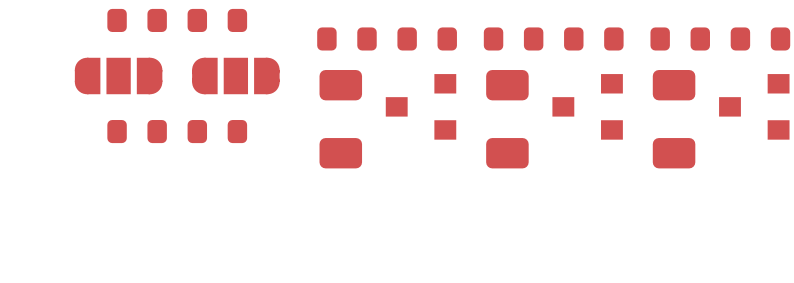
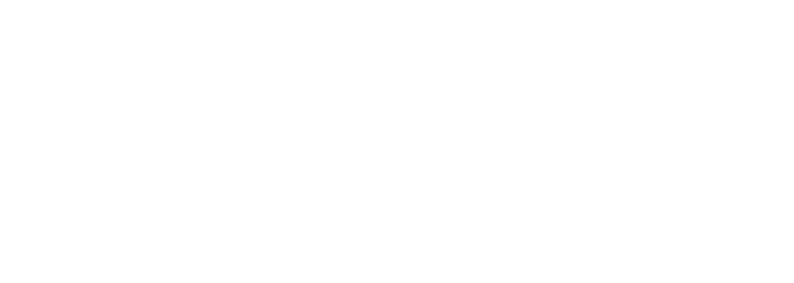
part: (137, 20) -> none
part: (217, 20) -> none
part: (346, 38) -> none
part: (427, 38) -> none
part: (513, 38) -> none
part: (593, 38) -> none
part: (680, 38) -> none
part: (760, 38) -> none
part: (118, 76) -> none
part: (235, 76) -> none
part: (421, 106) -> none
part: (587, 106) -> none
part: (754, 106) -> none
part: (340, 119) -> none
part: (507, 119) -> none
part: (674, 119) -> none
part: (137, 131) -> none
part: (217, 131) -> none

